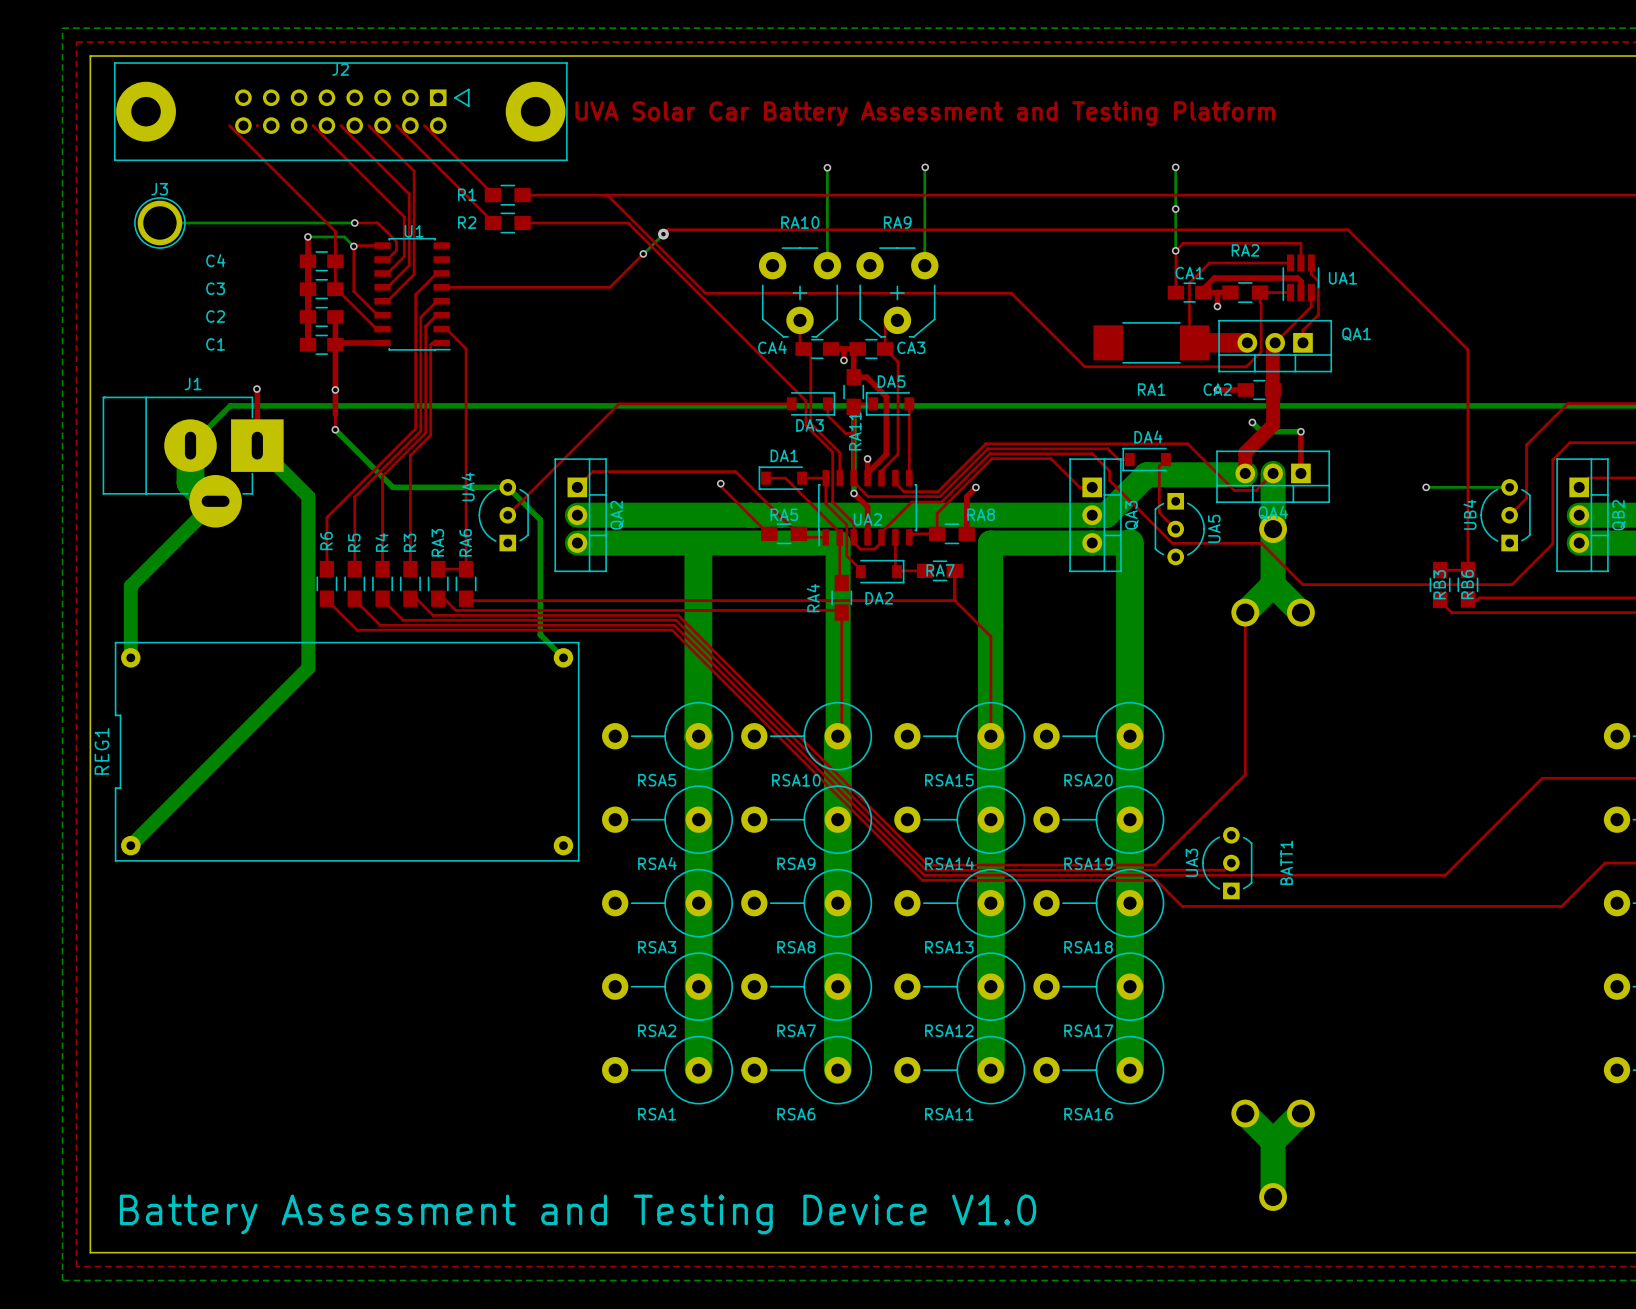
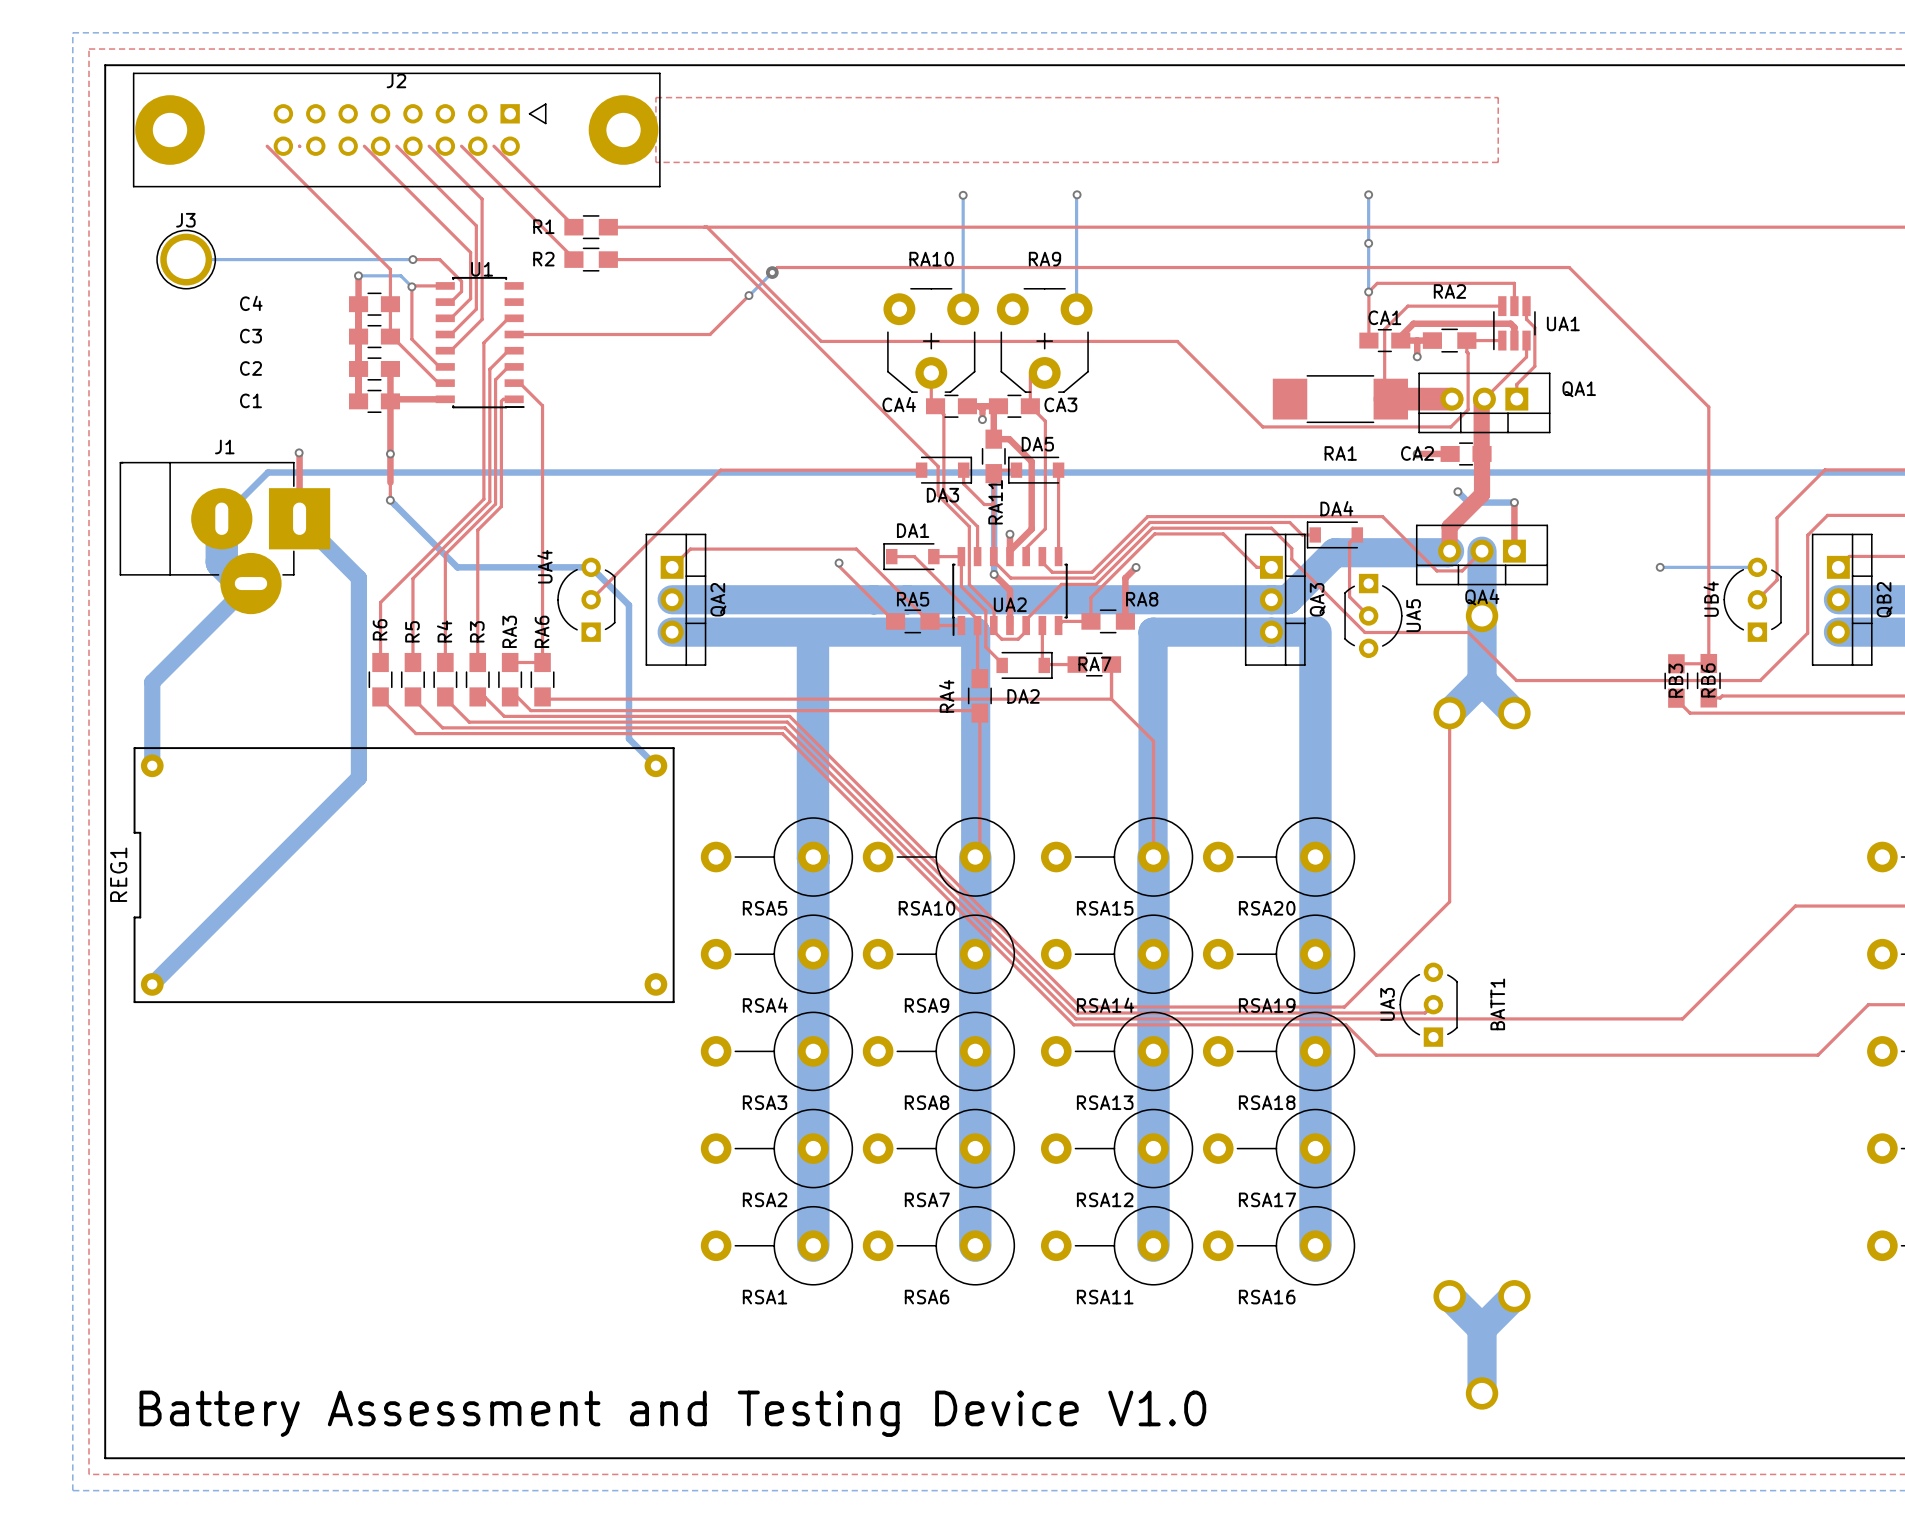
top zone outline: none -> (655, 97) (655, 162) (1498, 162) (1498, 97) (655, 97)
text: UVA Solar Car Battery Assessment and Testing Platform (925, 113) -> none

